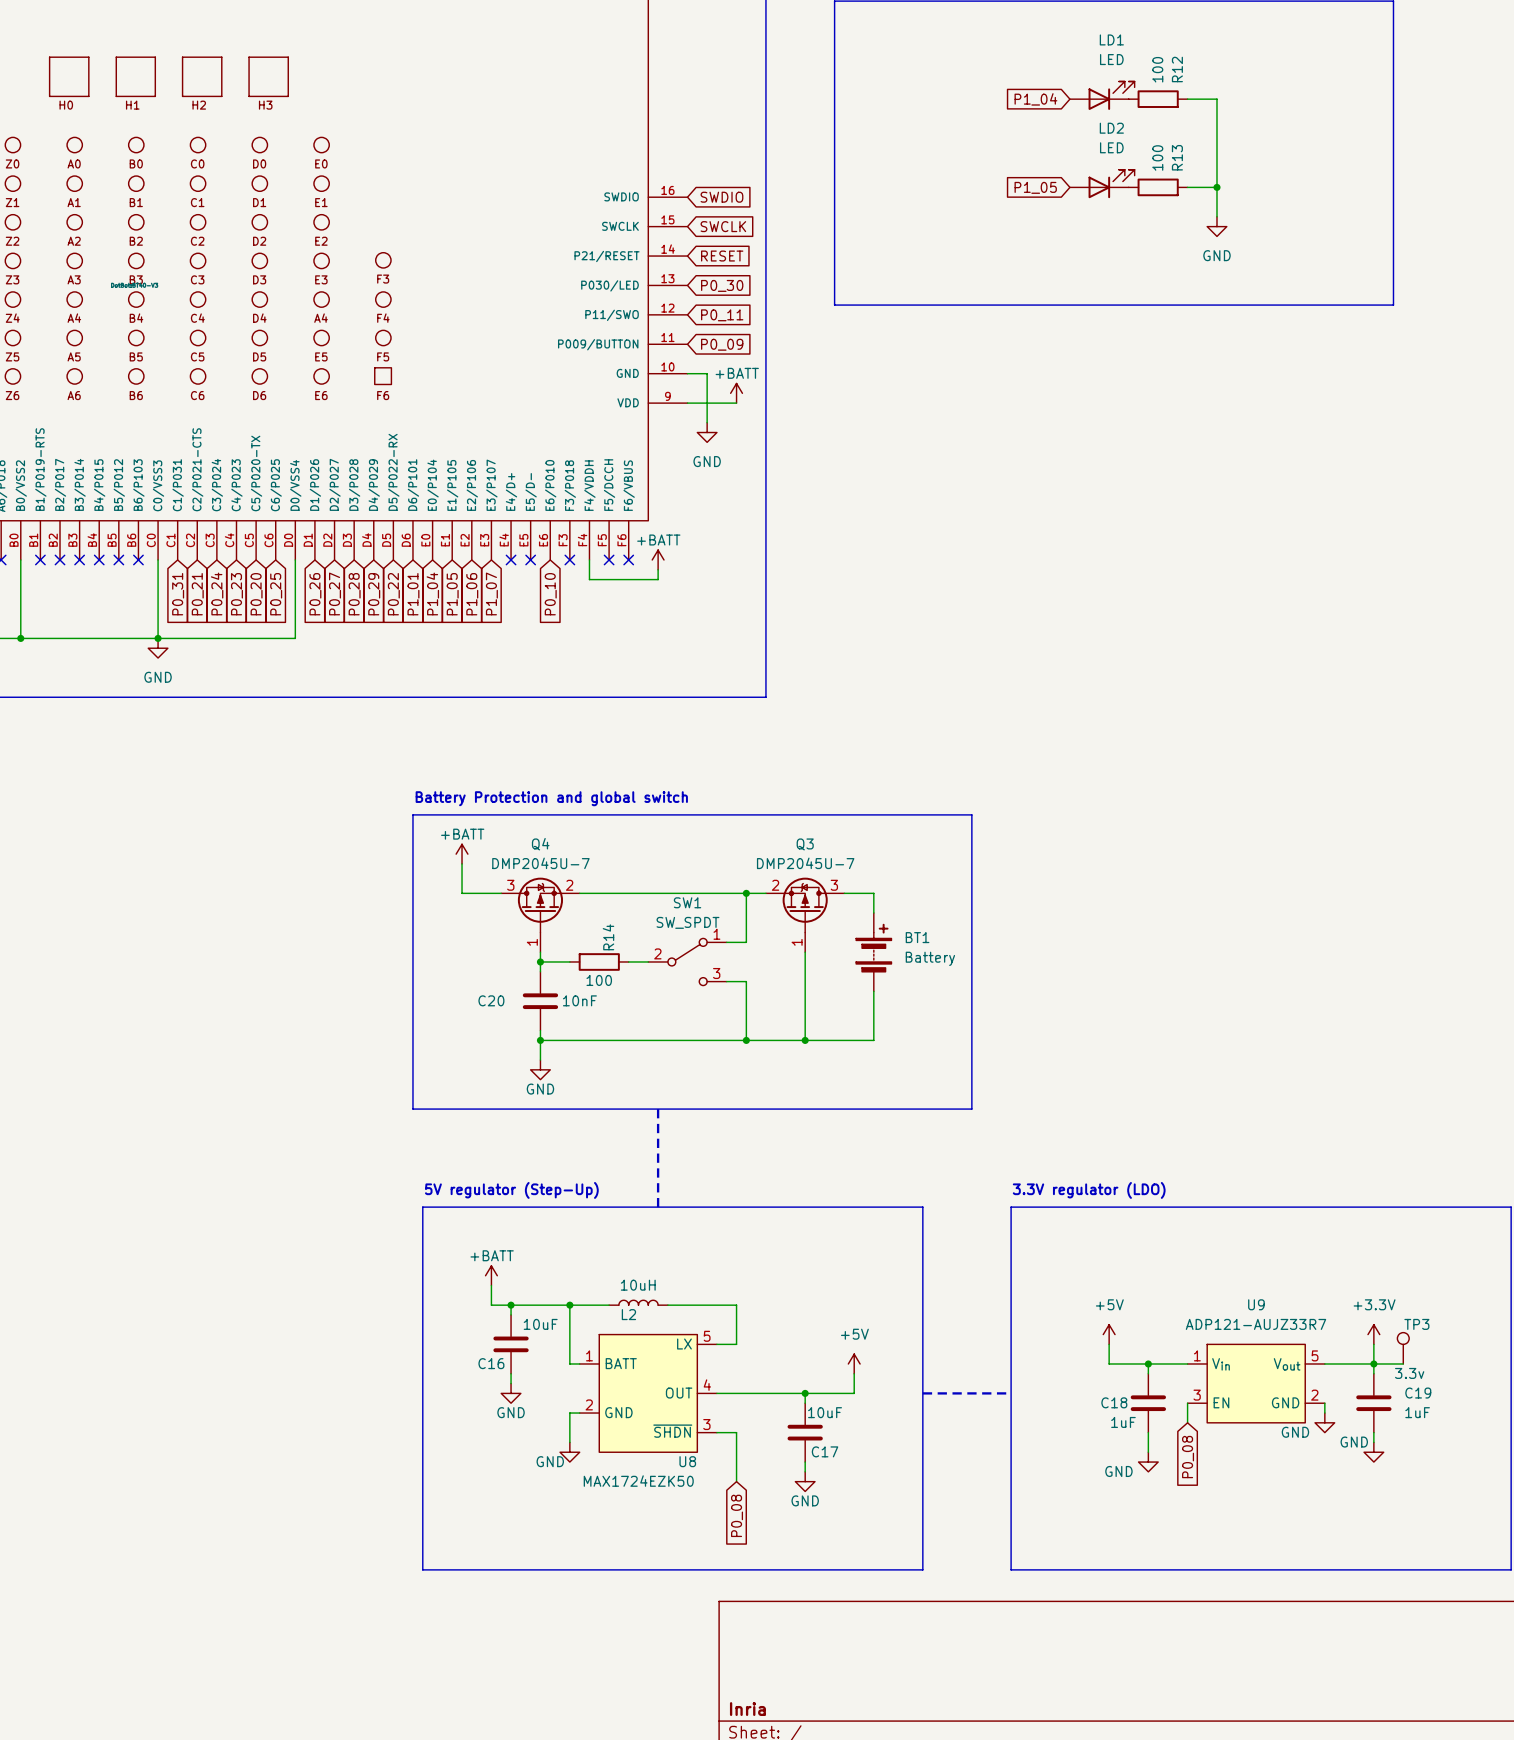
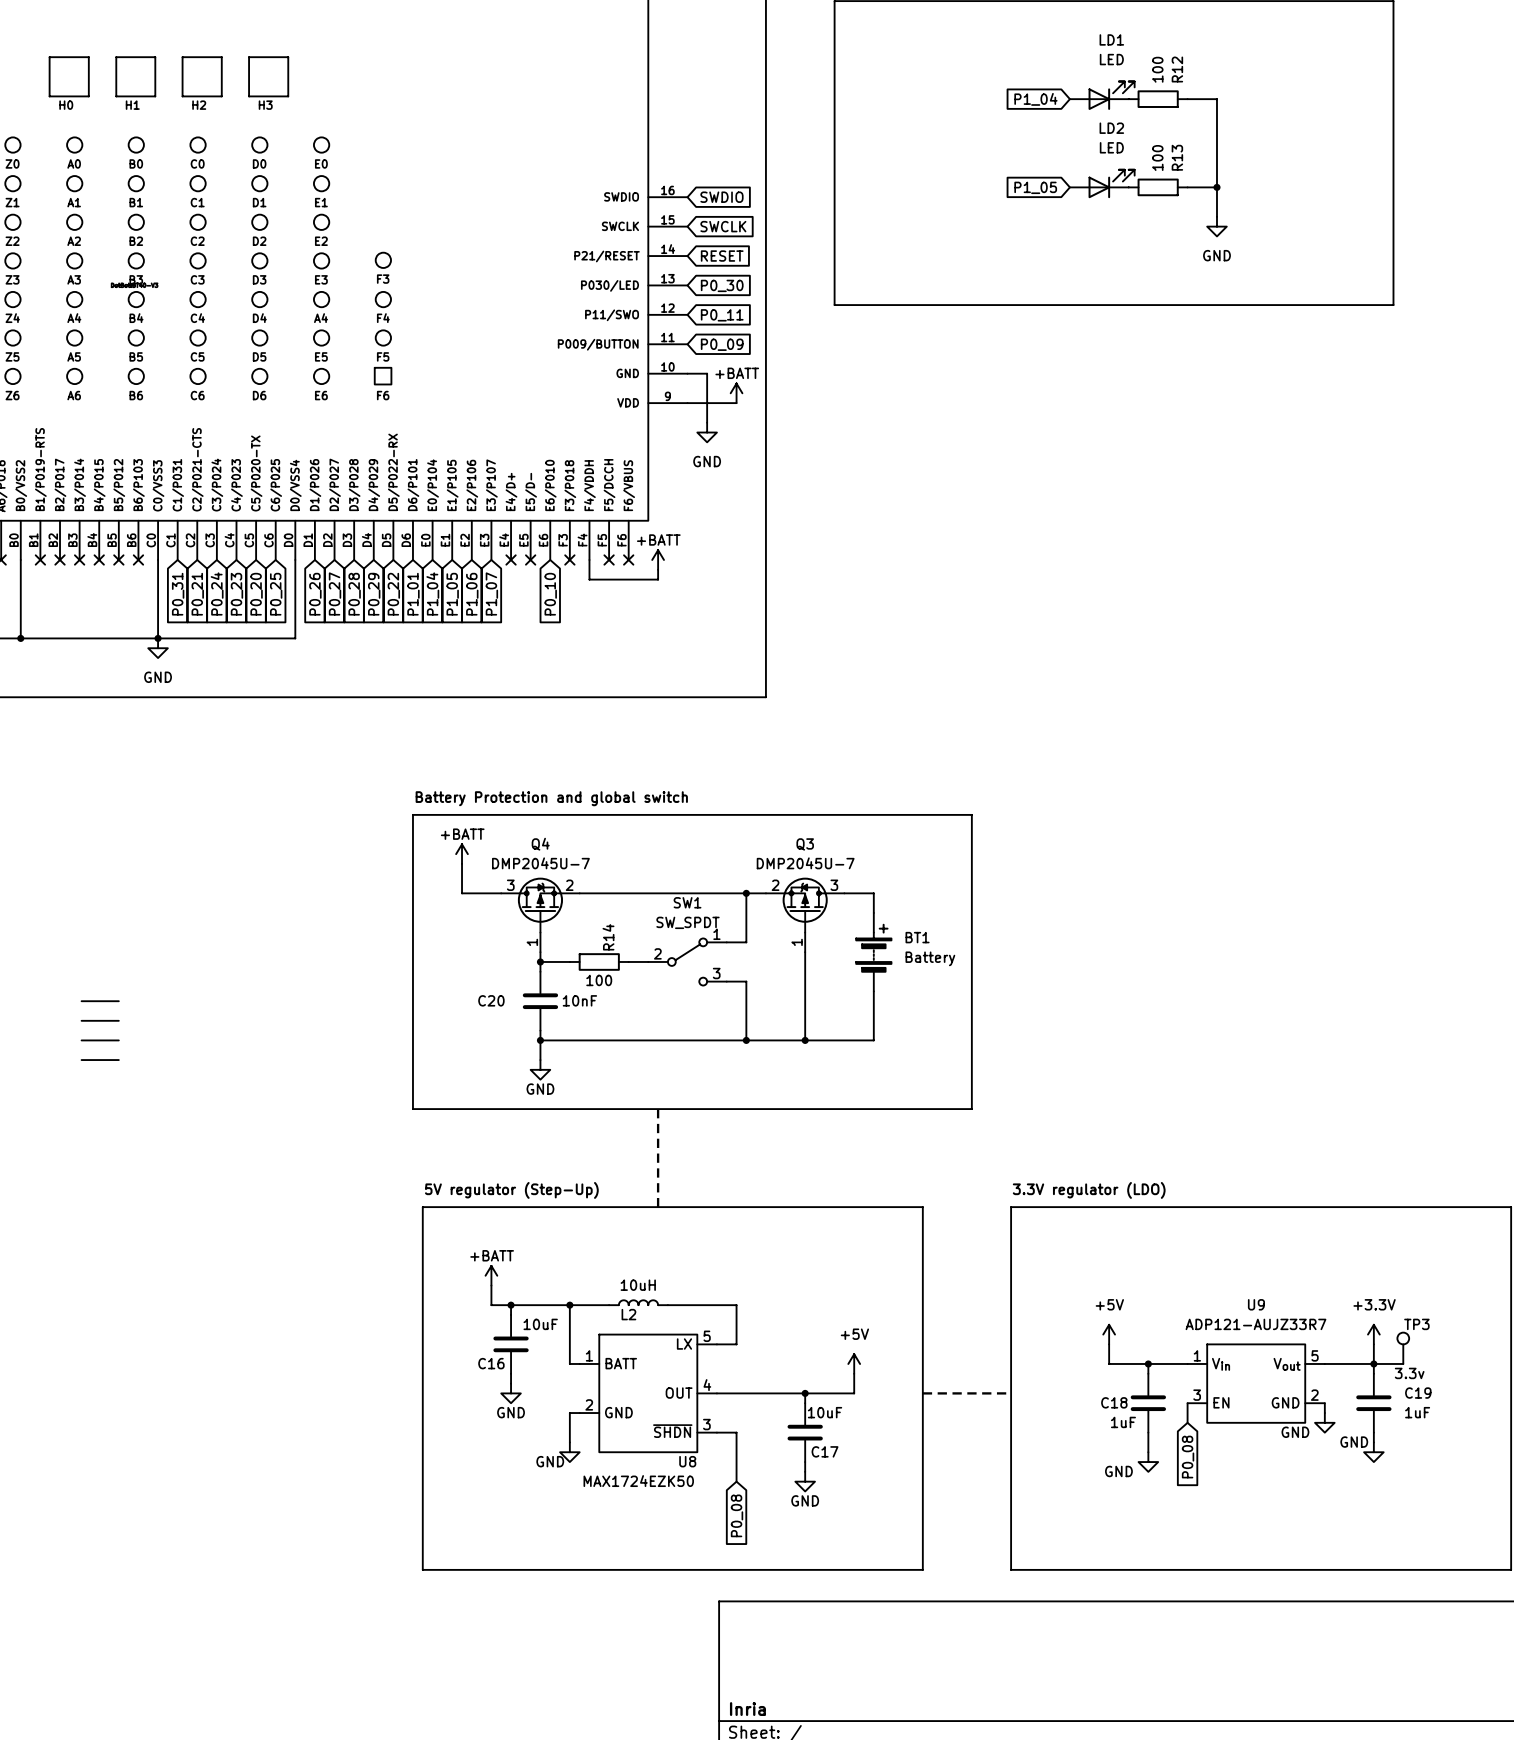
wire: none -> (81, 1001) (118, 1001)
wire: none -> (81, 1020) (118, 1020)
wire: none -> (81, 1040) (118, 1040)
wire: none -> (81, 1060) (118, 1060)

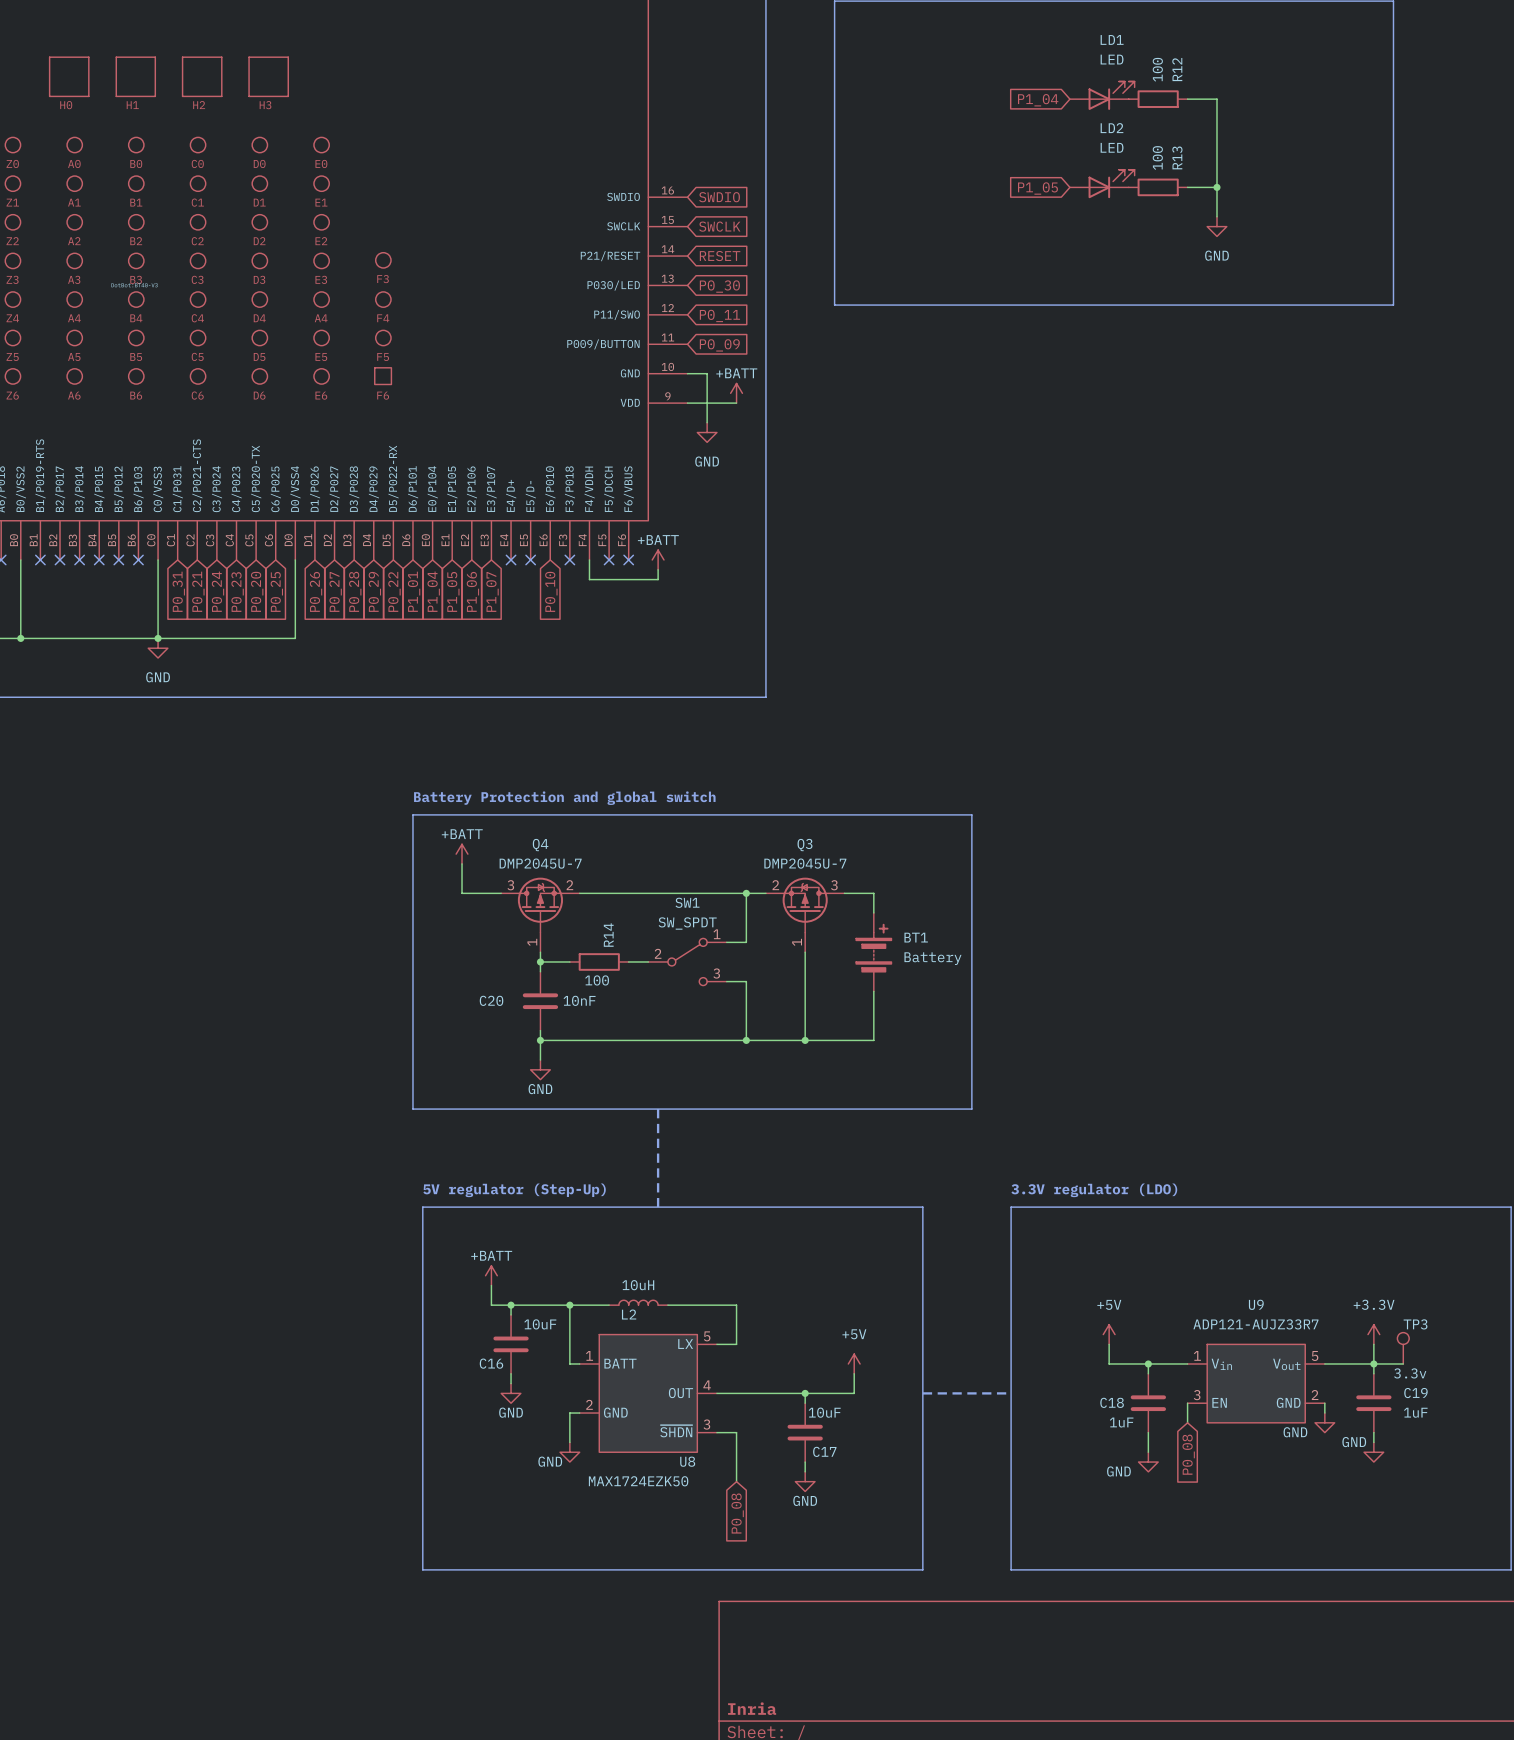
wire: (81, 1001) (118, 1001) -> none
wire: (81, 1020) (118, 1020) -> none
wire: (81, 1040) (118, 1040) -> none
wire: (81, 1060) (118, 1060) -> none

